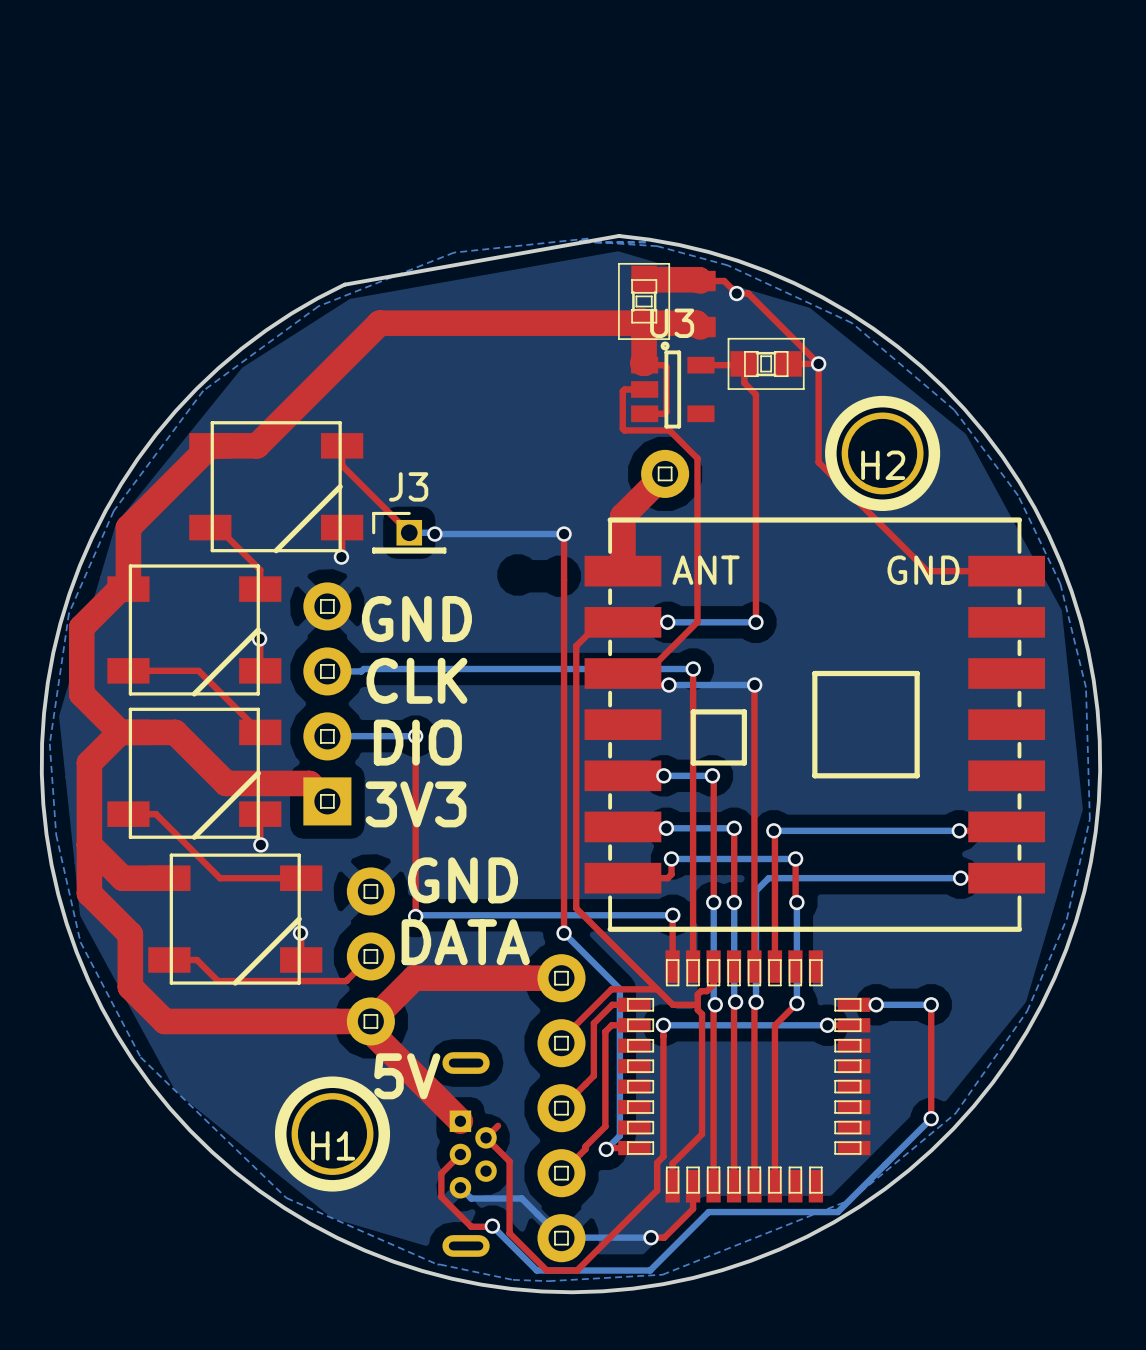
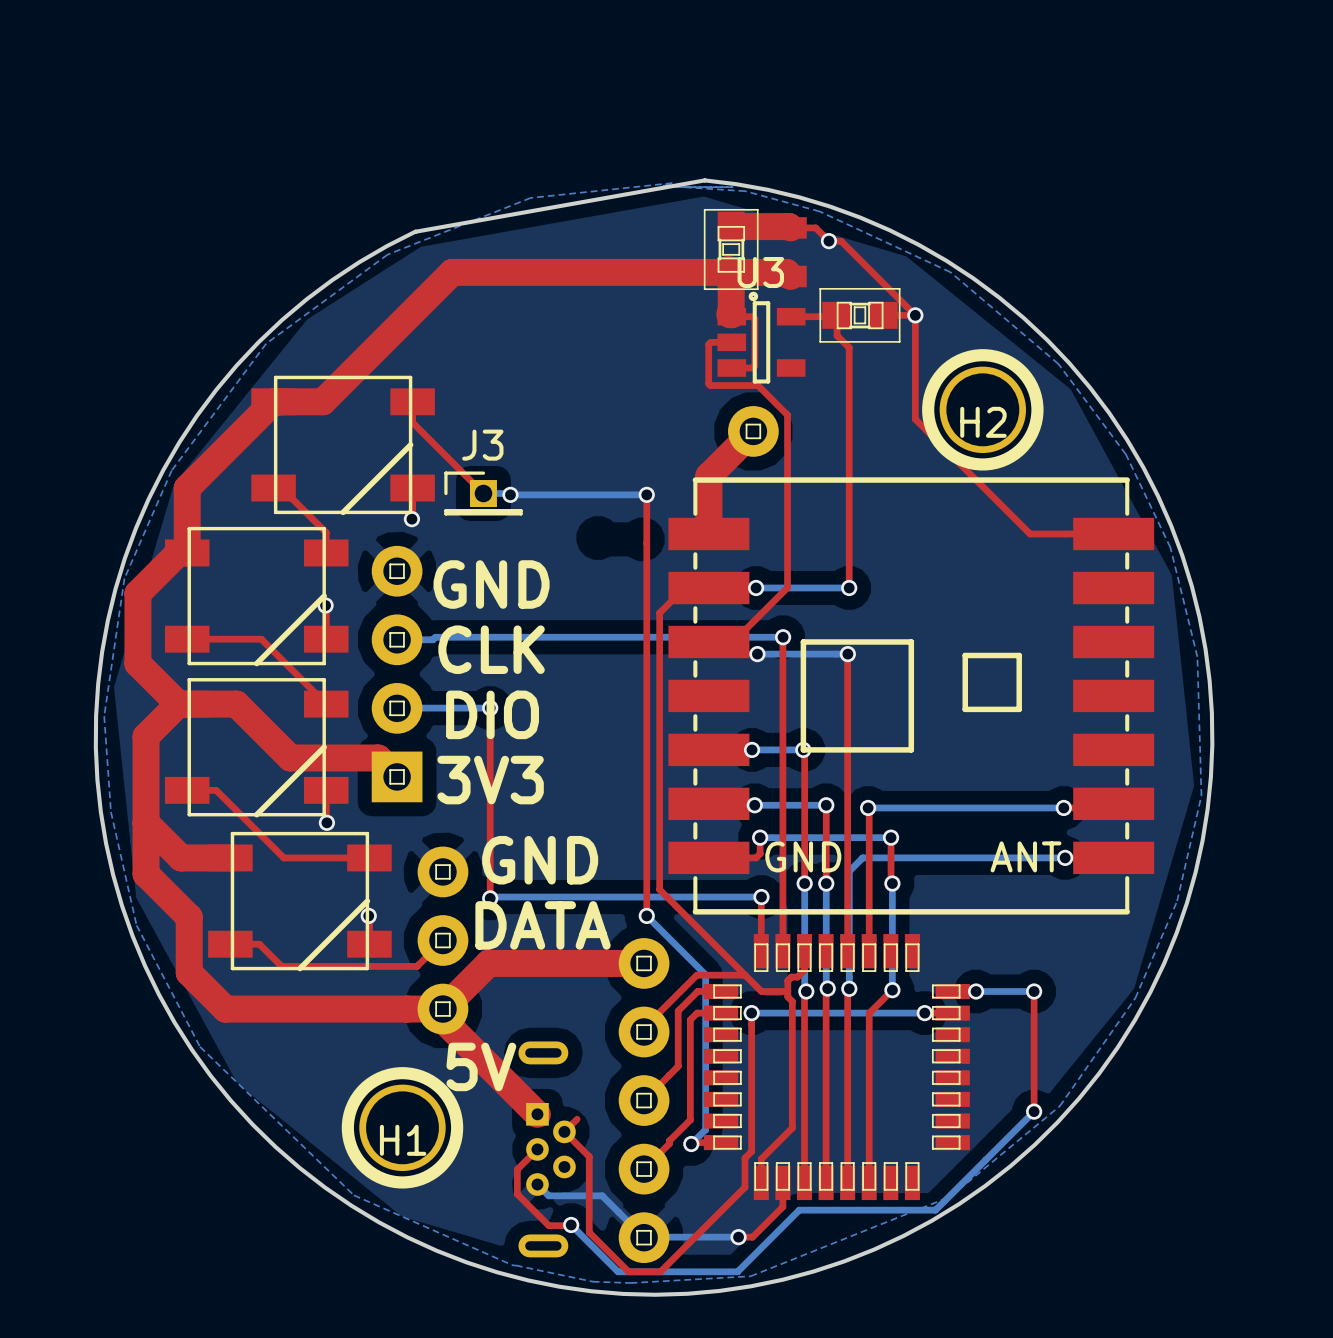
part footprint: [584, 517, 1046, 932] -> [668, 477, 1155, 915]

